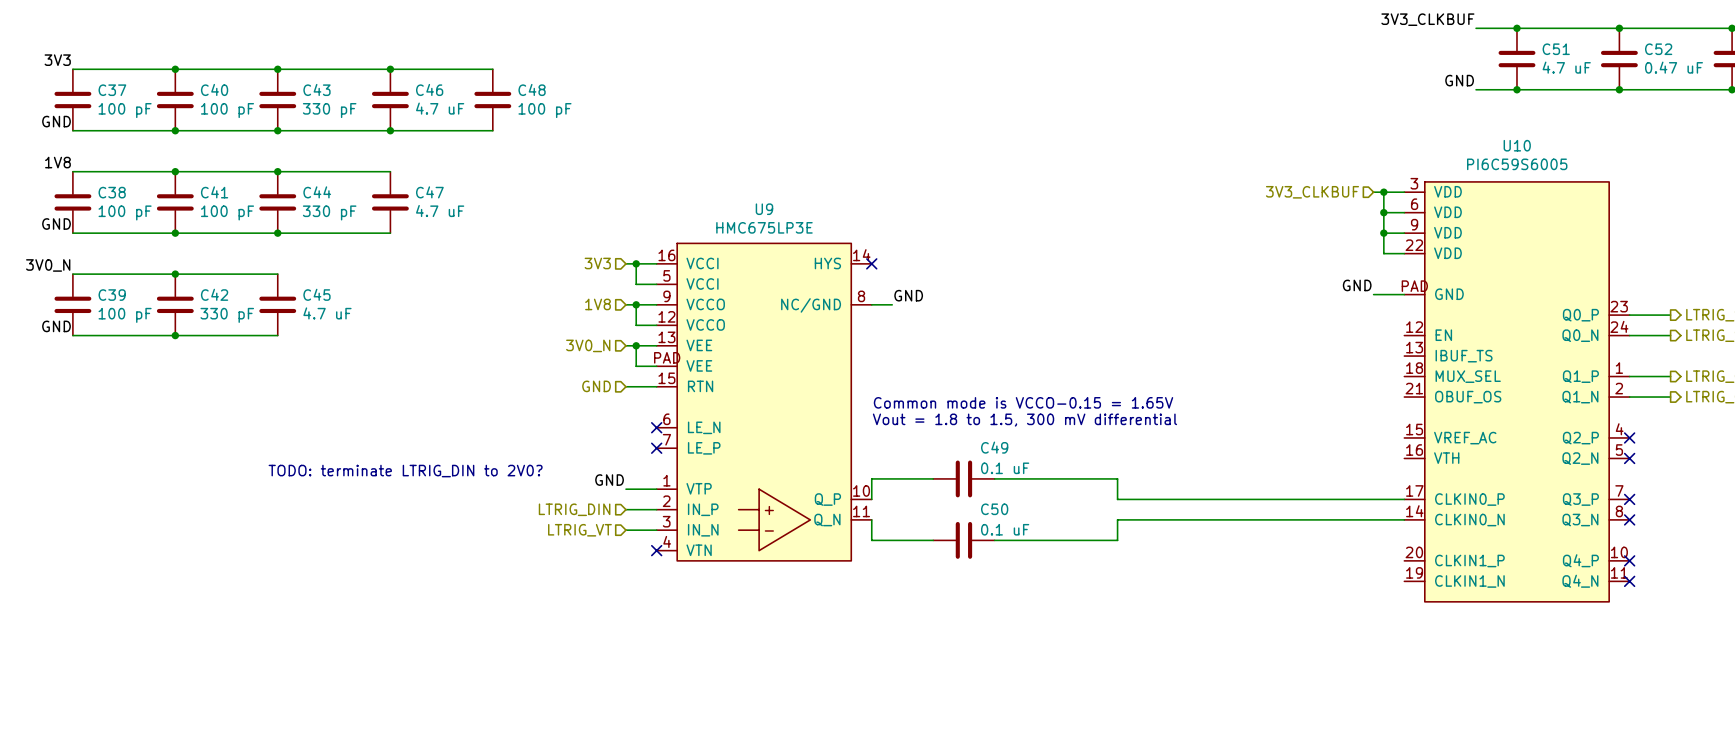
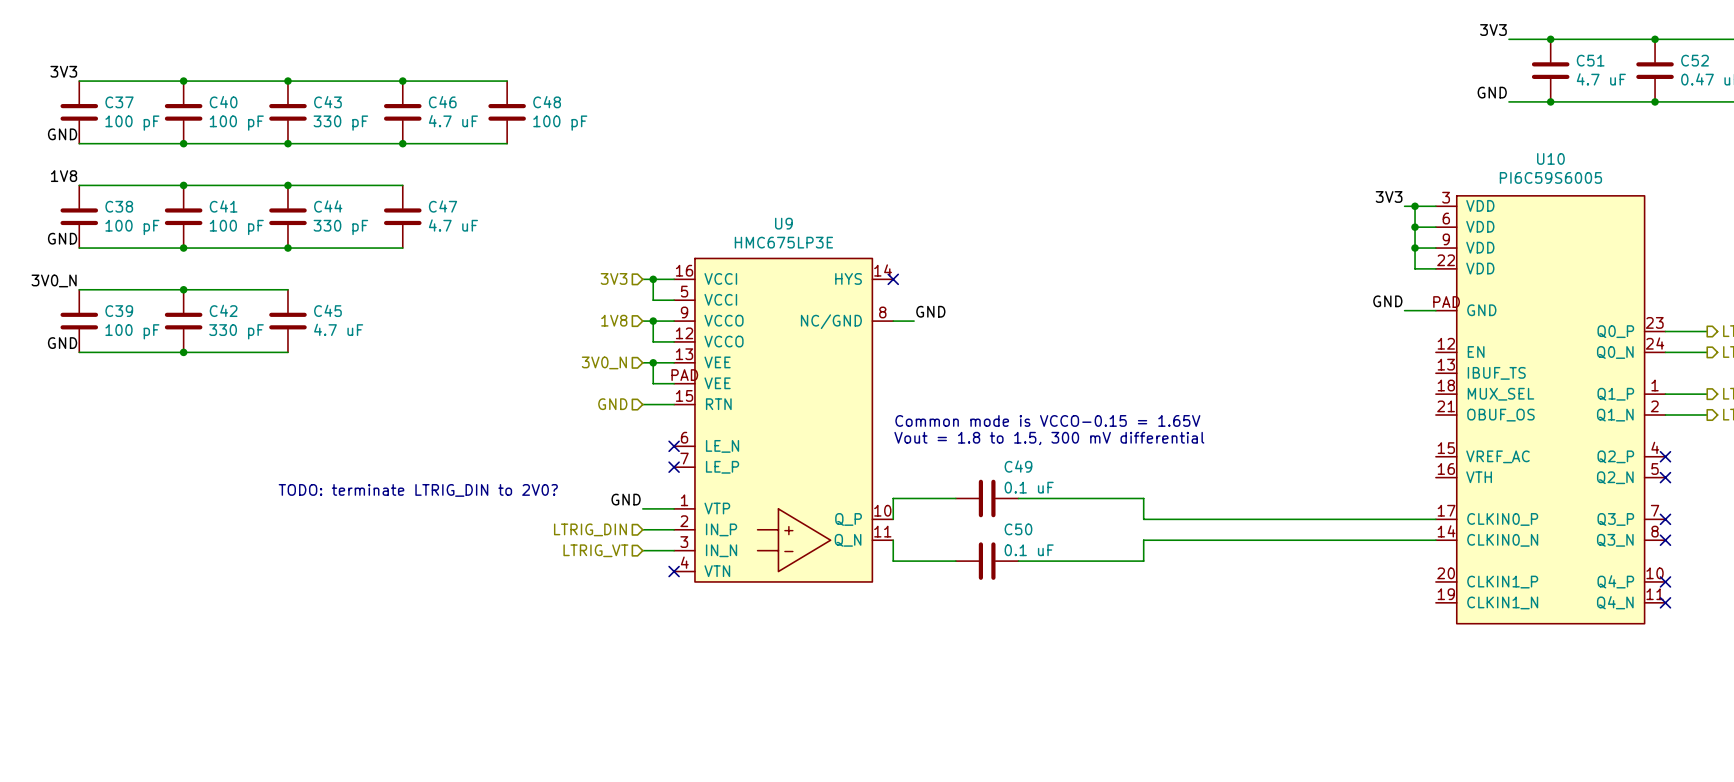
label: 3V3_CLKBUF (1427, 19) -> 3V3 (1493, 30)
label: none -> 3V3 (1389, 196)
hierarchical label: 3V3_CLKBUF (1312, 192) -> none

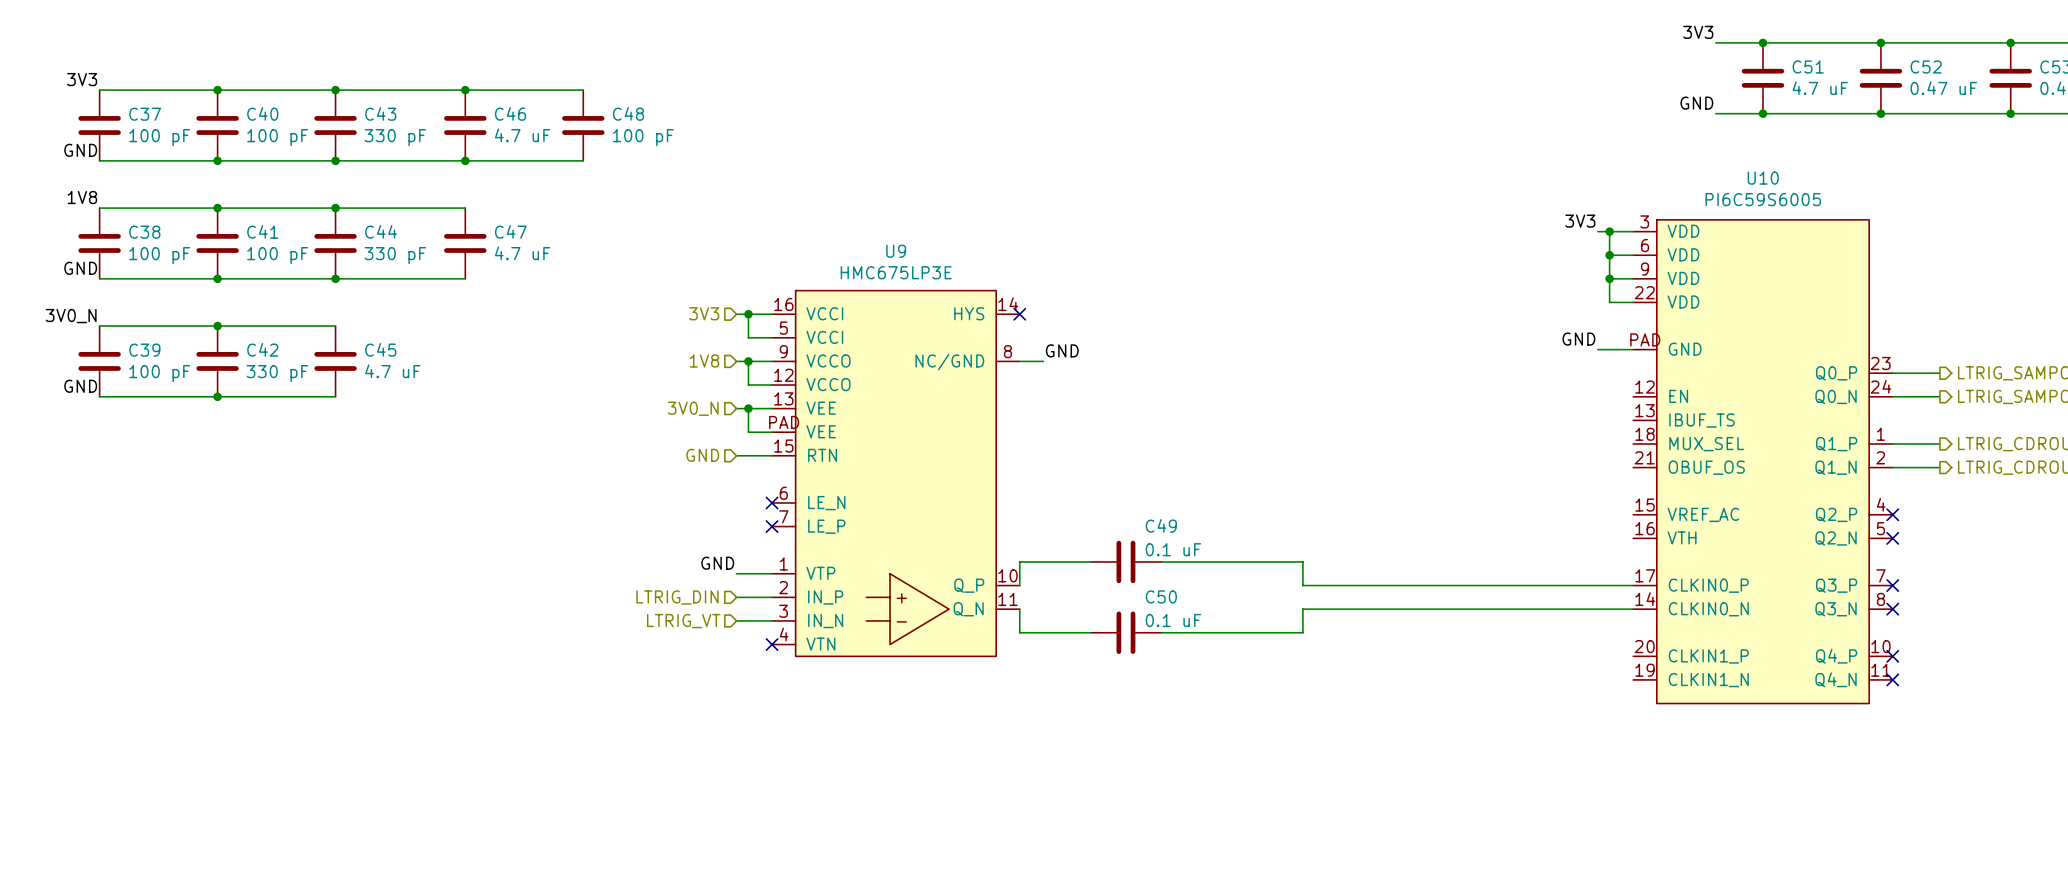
text: Common mode is VCCO-0.15 = 1.65V (1047, 420) -> none
text: Vout = 1.8 to 1.5, 300 mV differential (1049, 438) -> none
text: TODO: terminate LTRIG_DIN to 2V0? (418, 490) -> none

